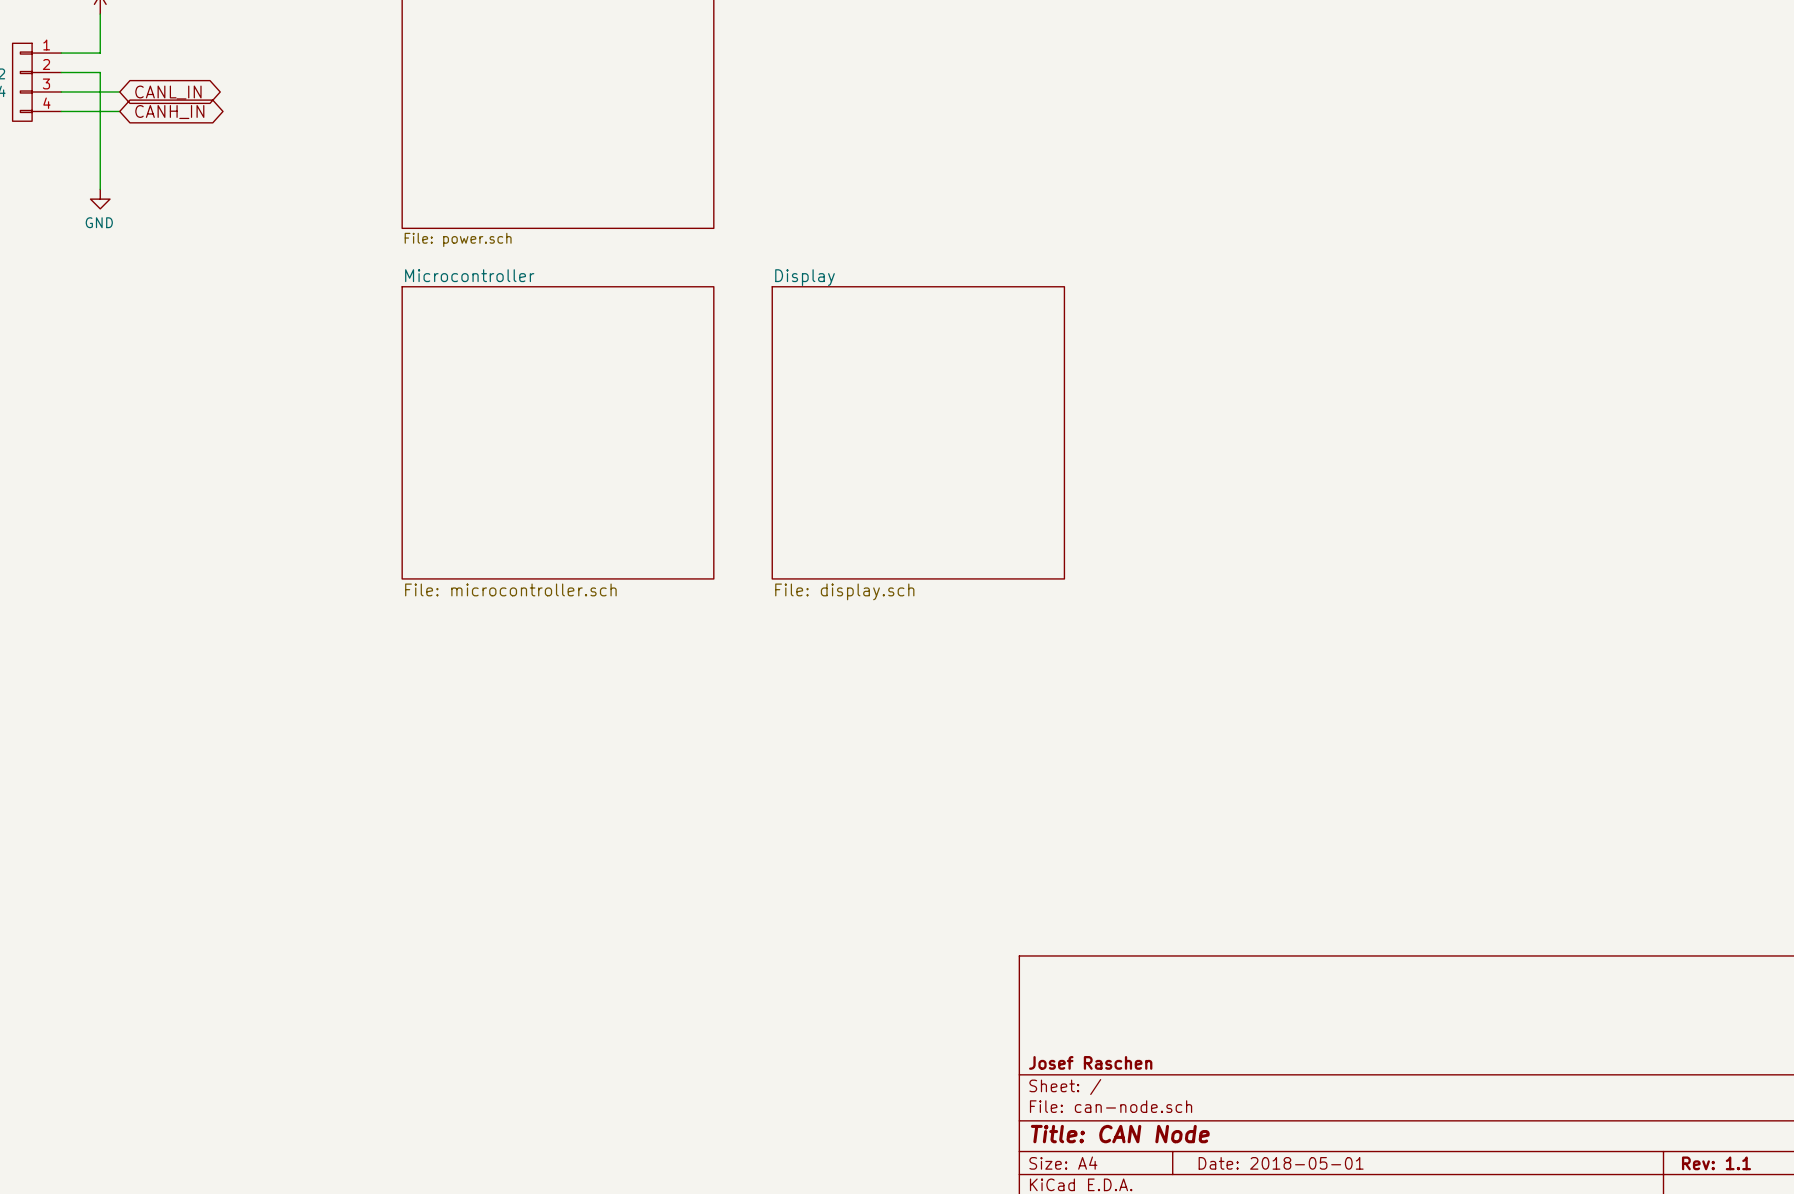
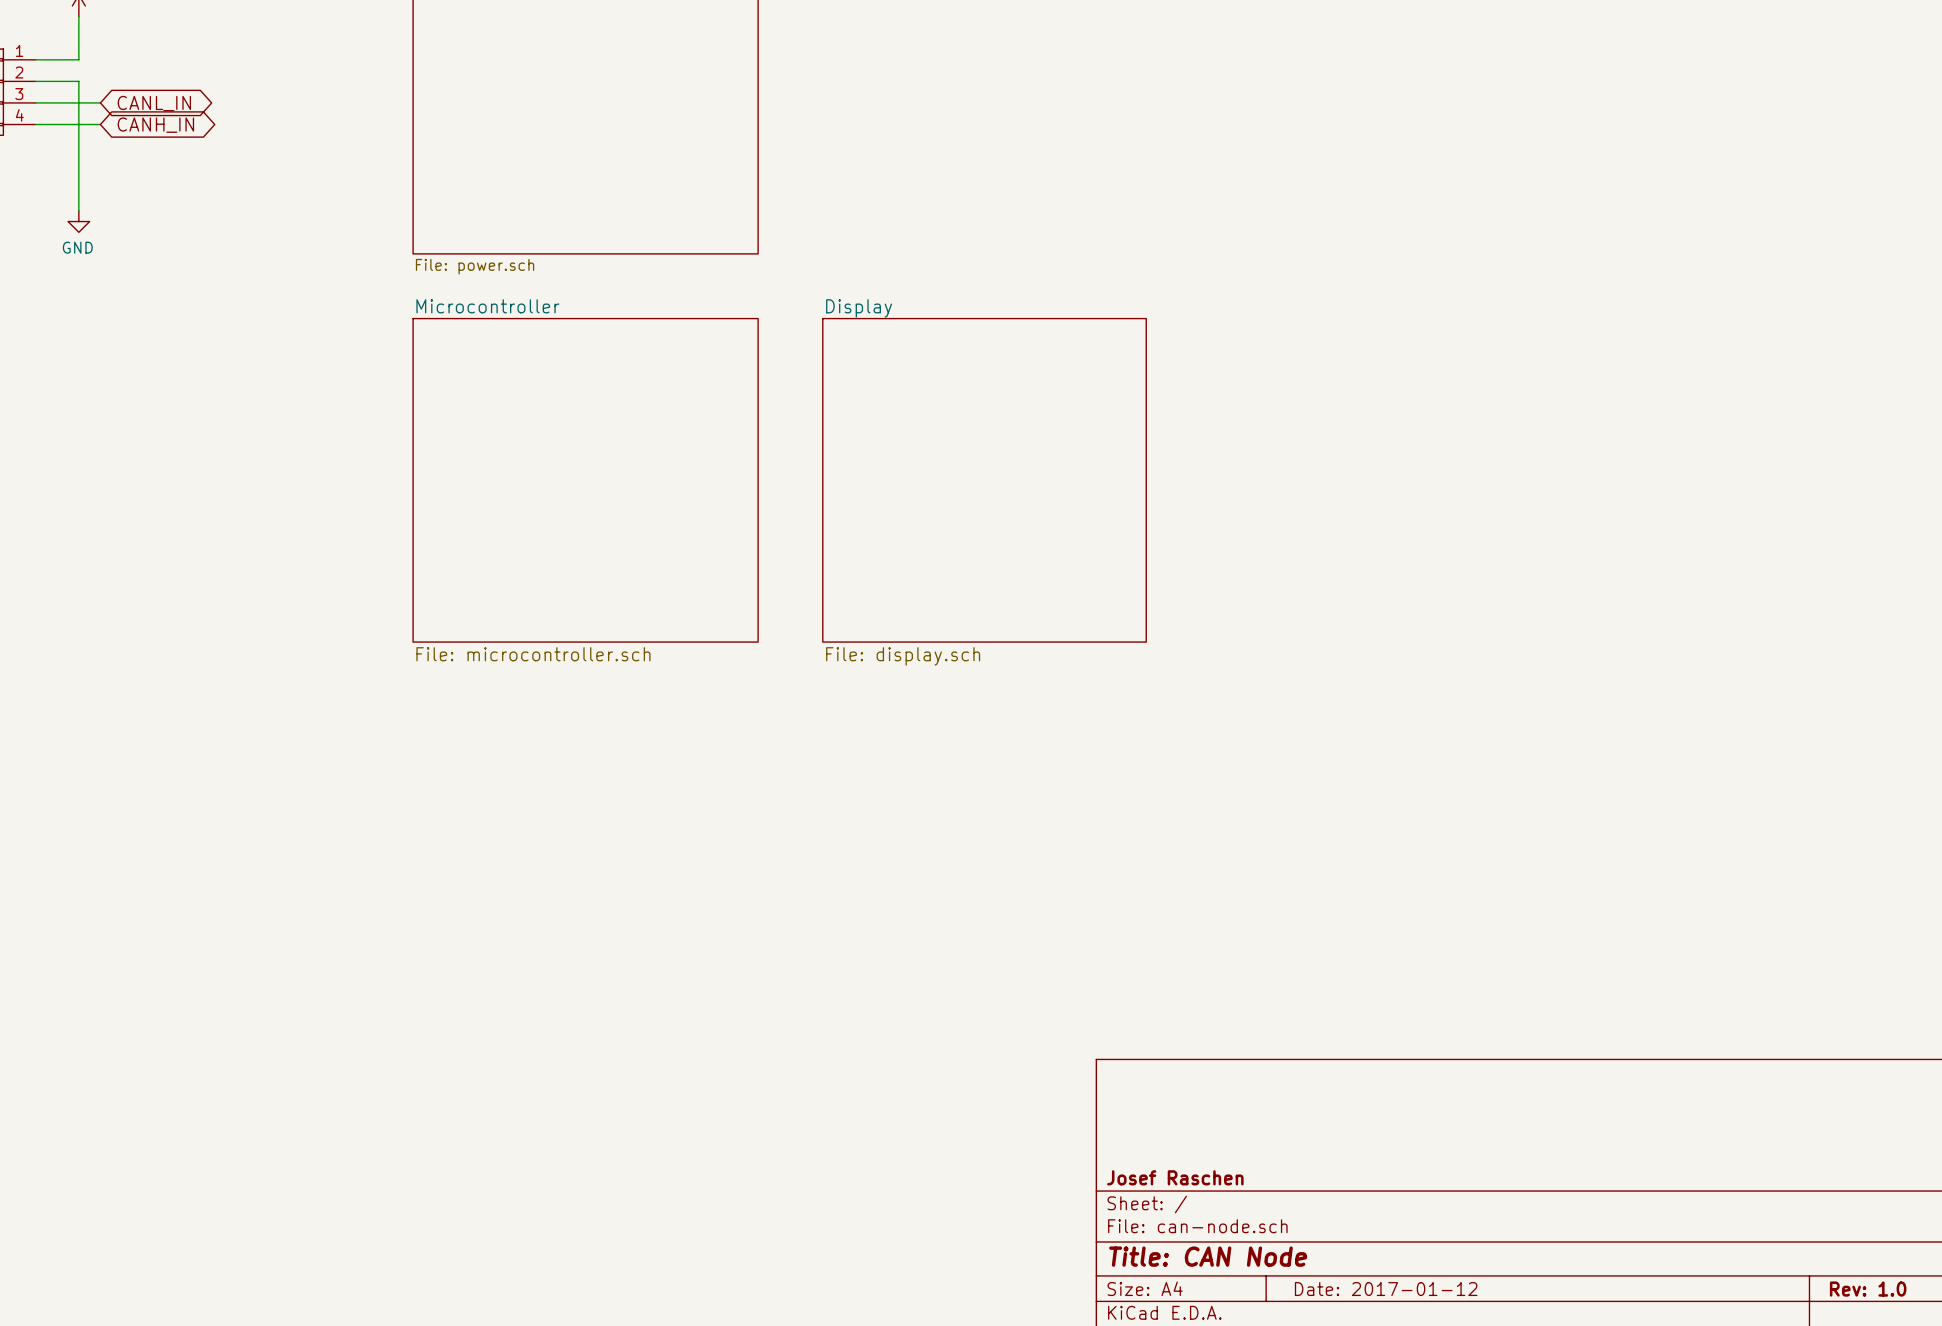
title block: Date: 2018-05-01 (1281, 1163) -> Date: 2017-01-12 (1386, 1289)
title block: Rev: 1.1 (1716, 1163) -> Rev: 1.0 (1868, 1289)

